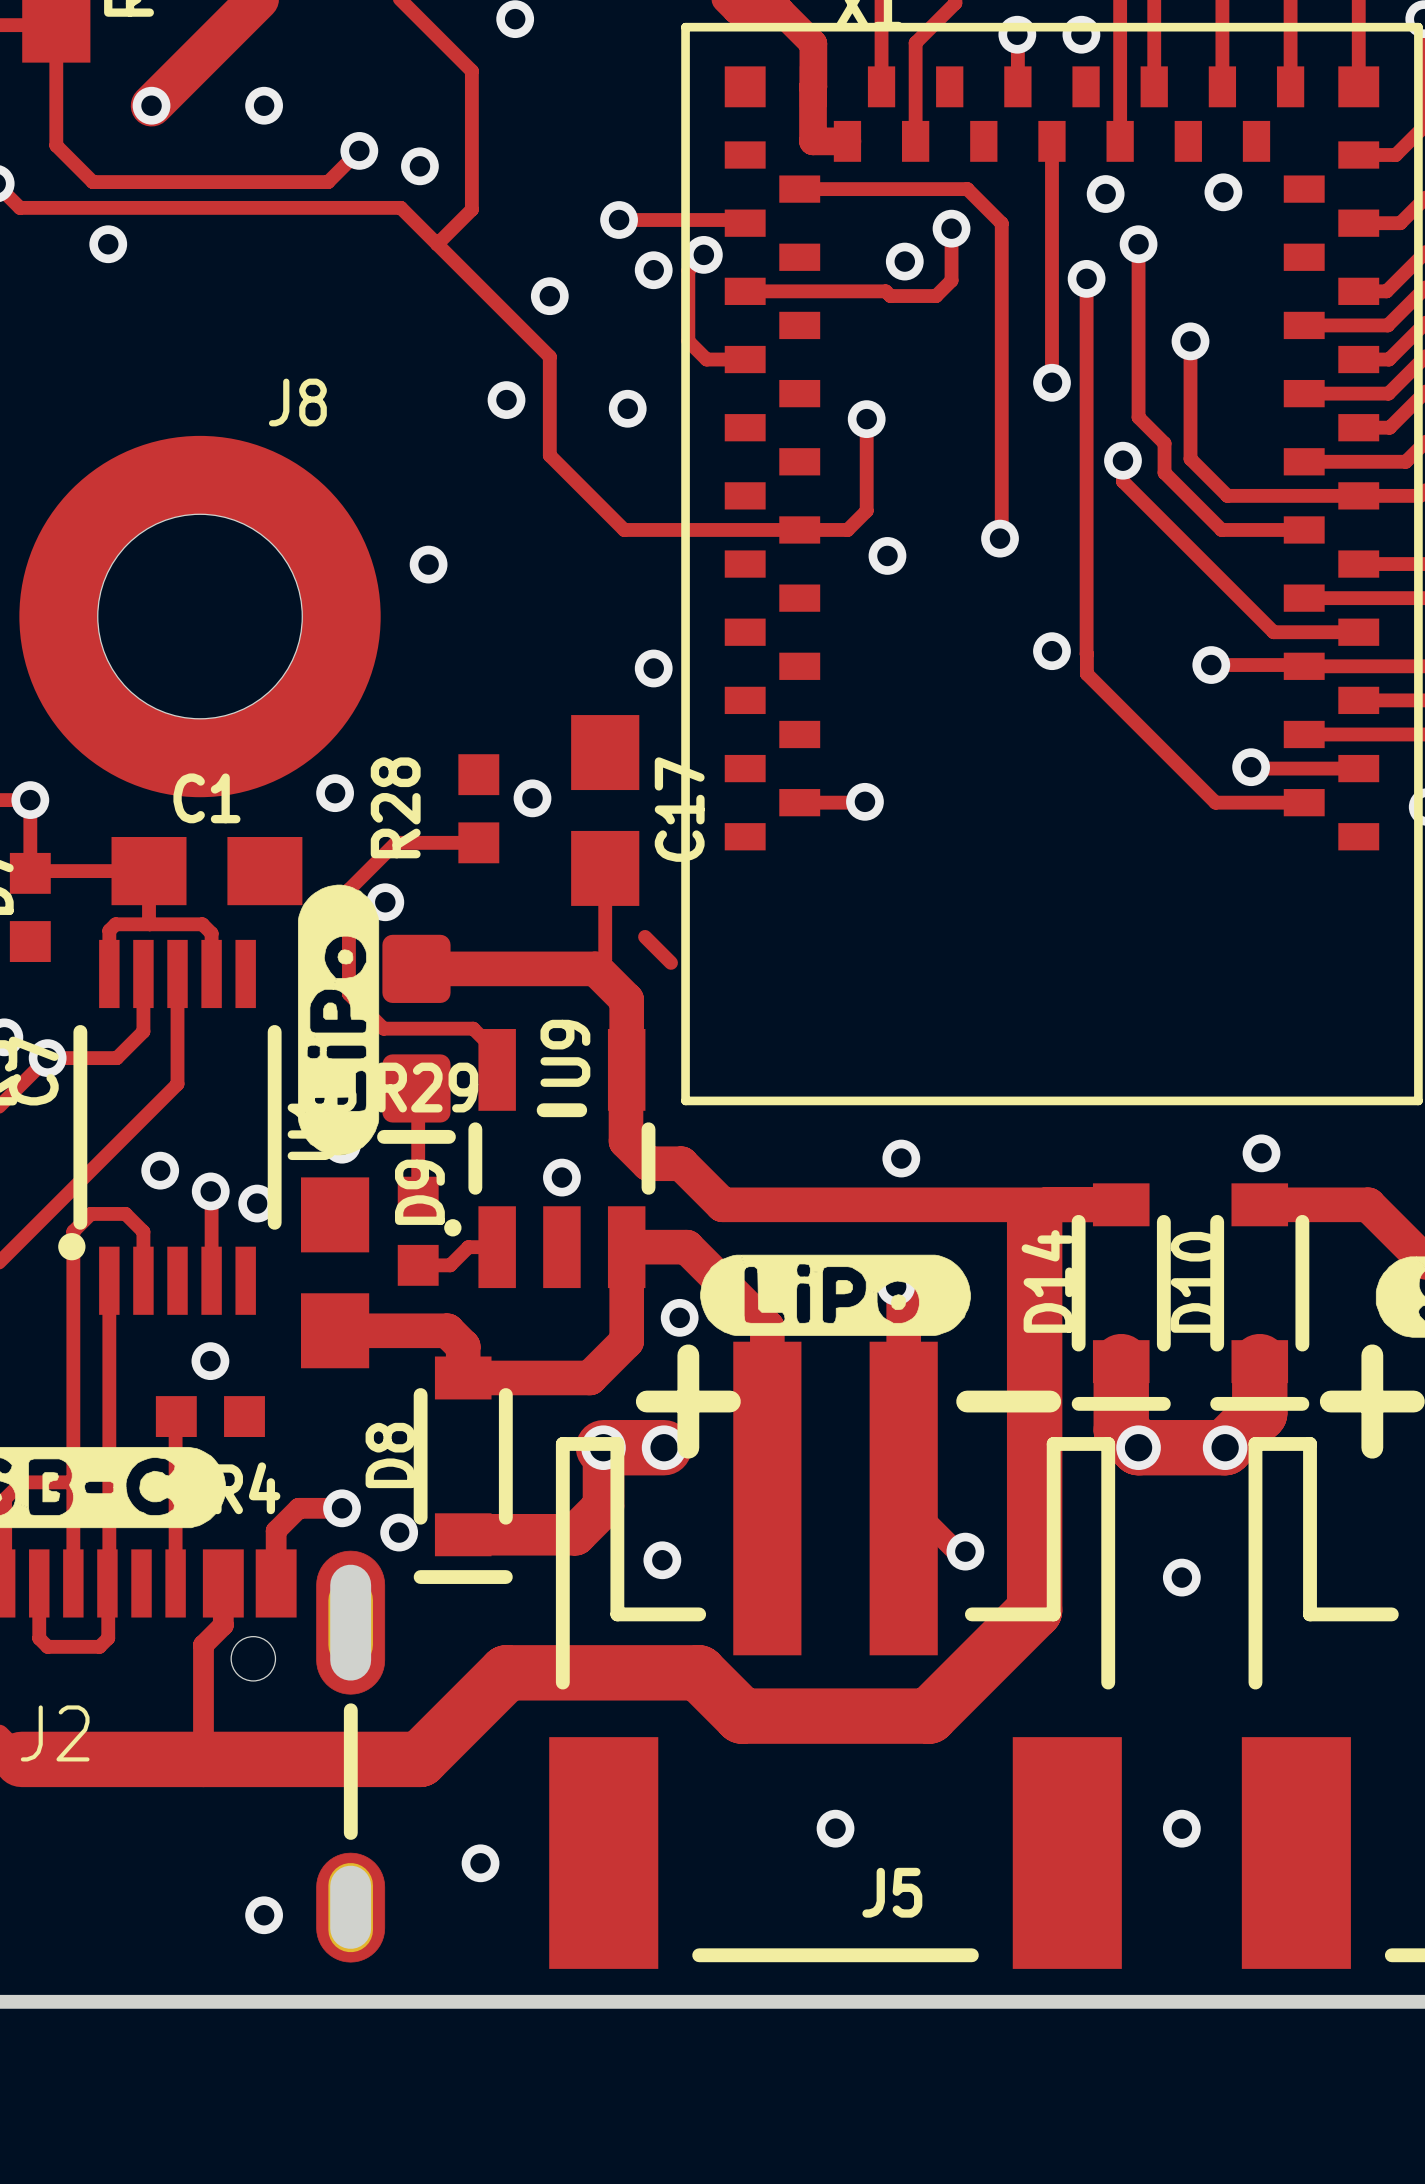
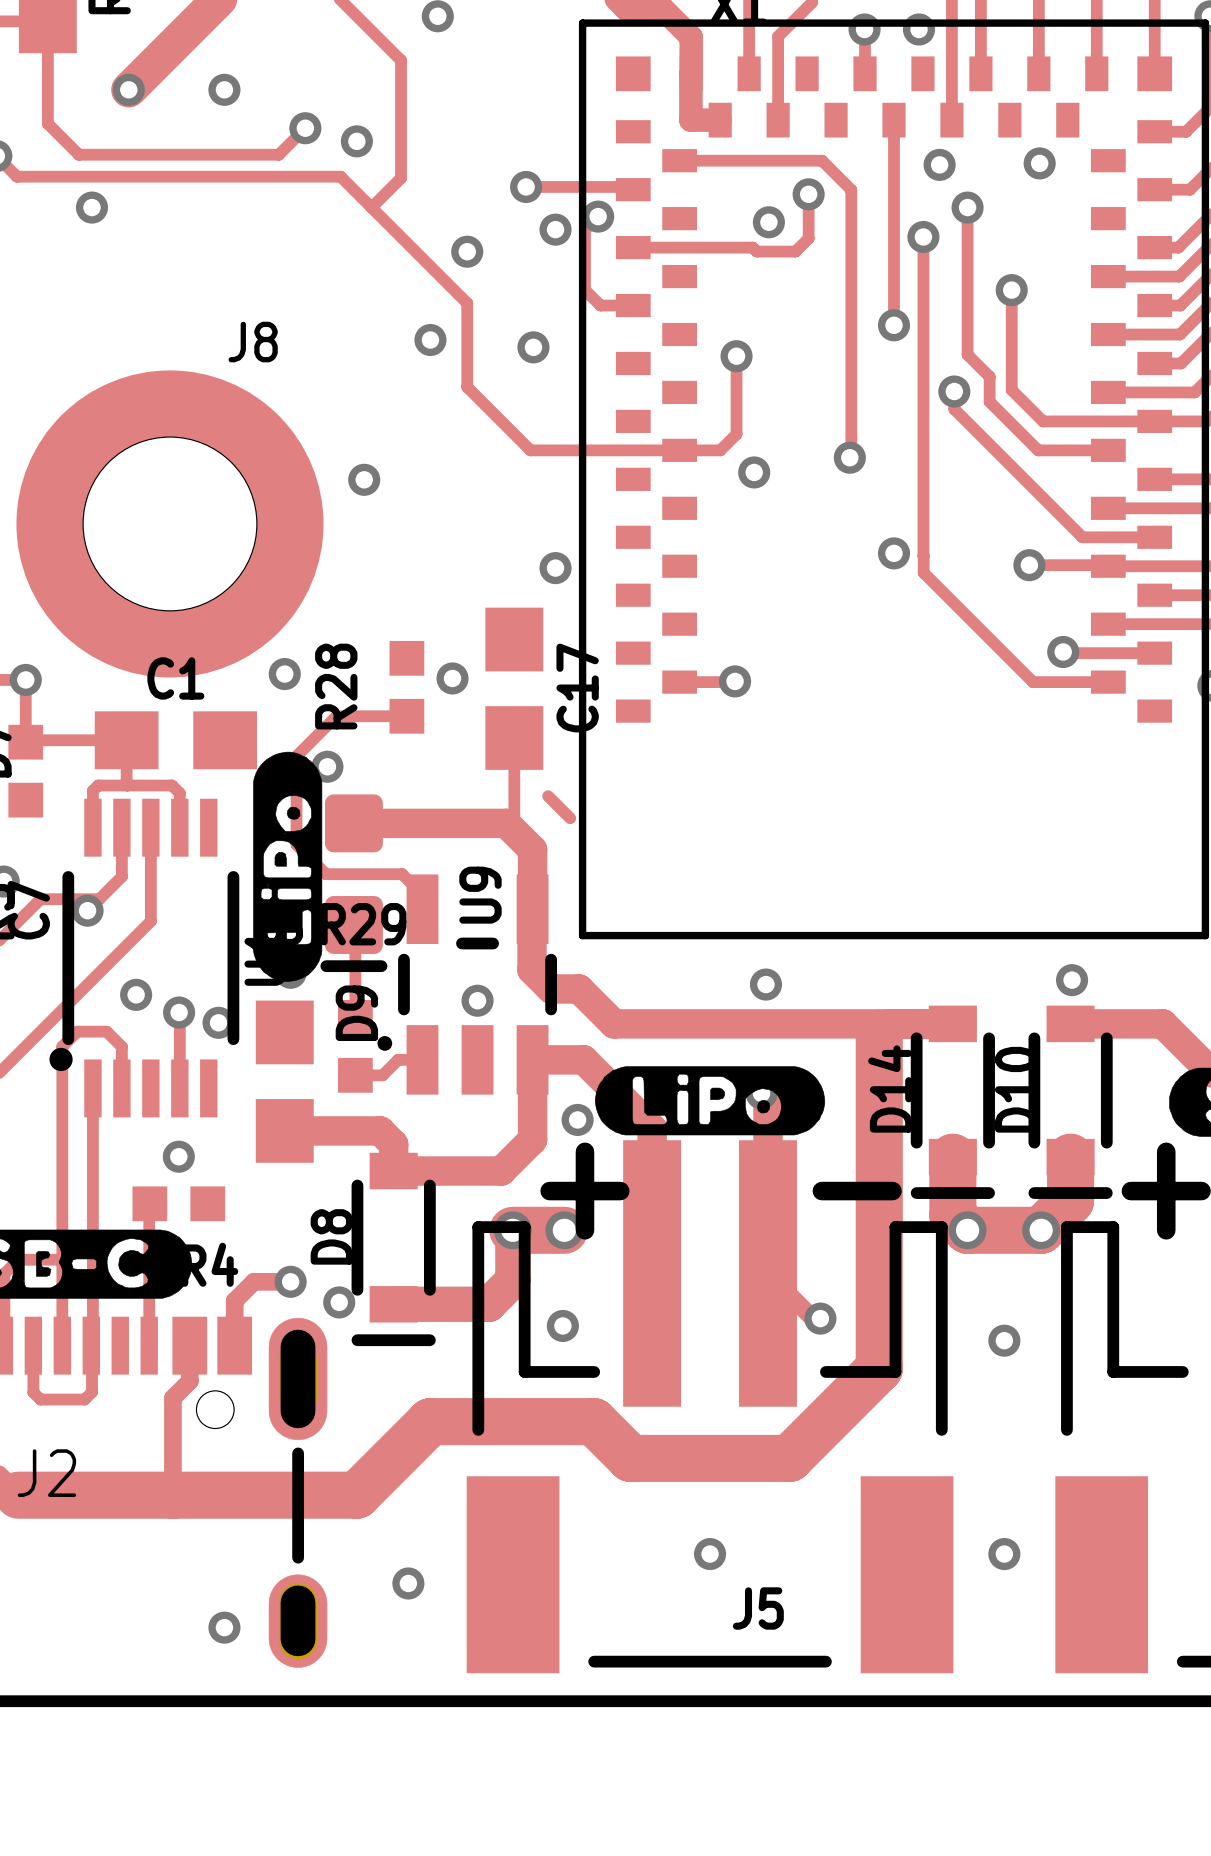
via position: (47, 1058) -> (87, 910)

